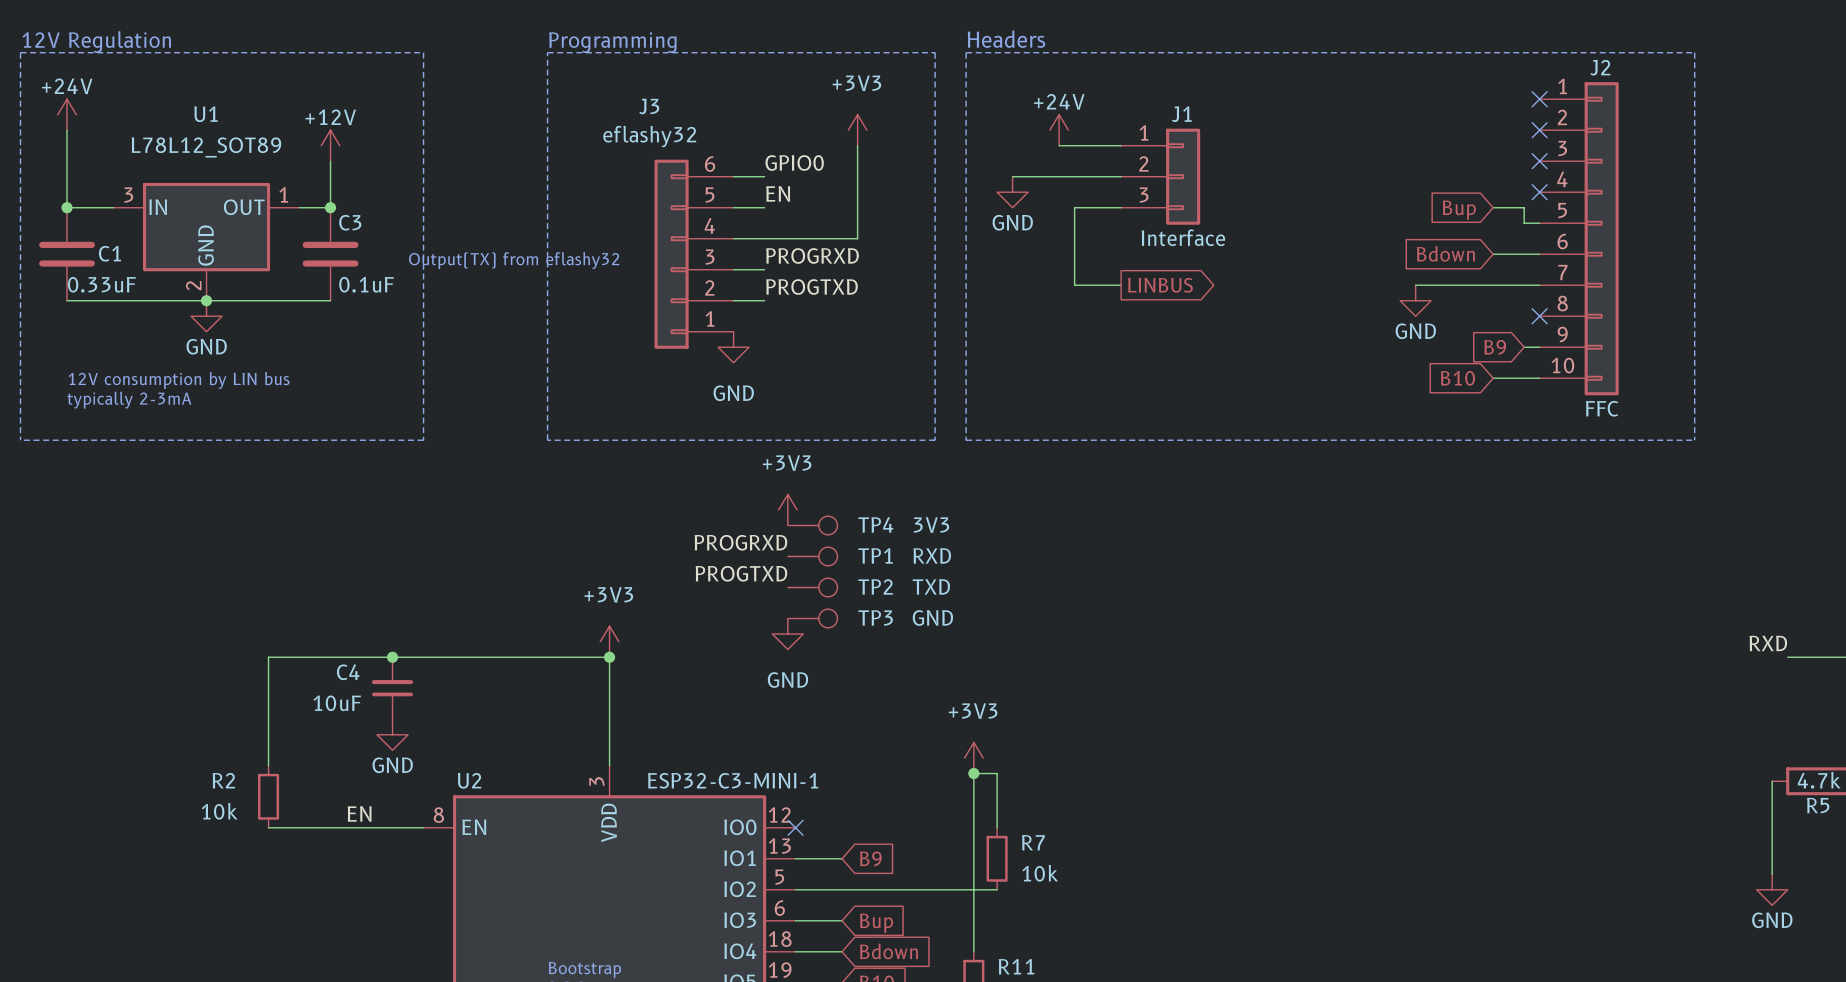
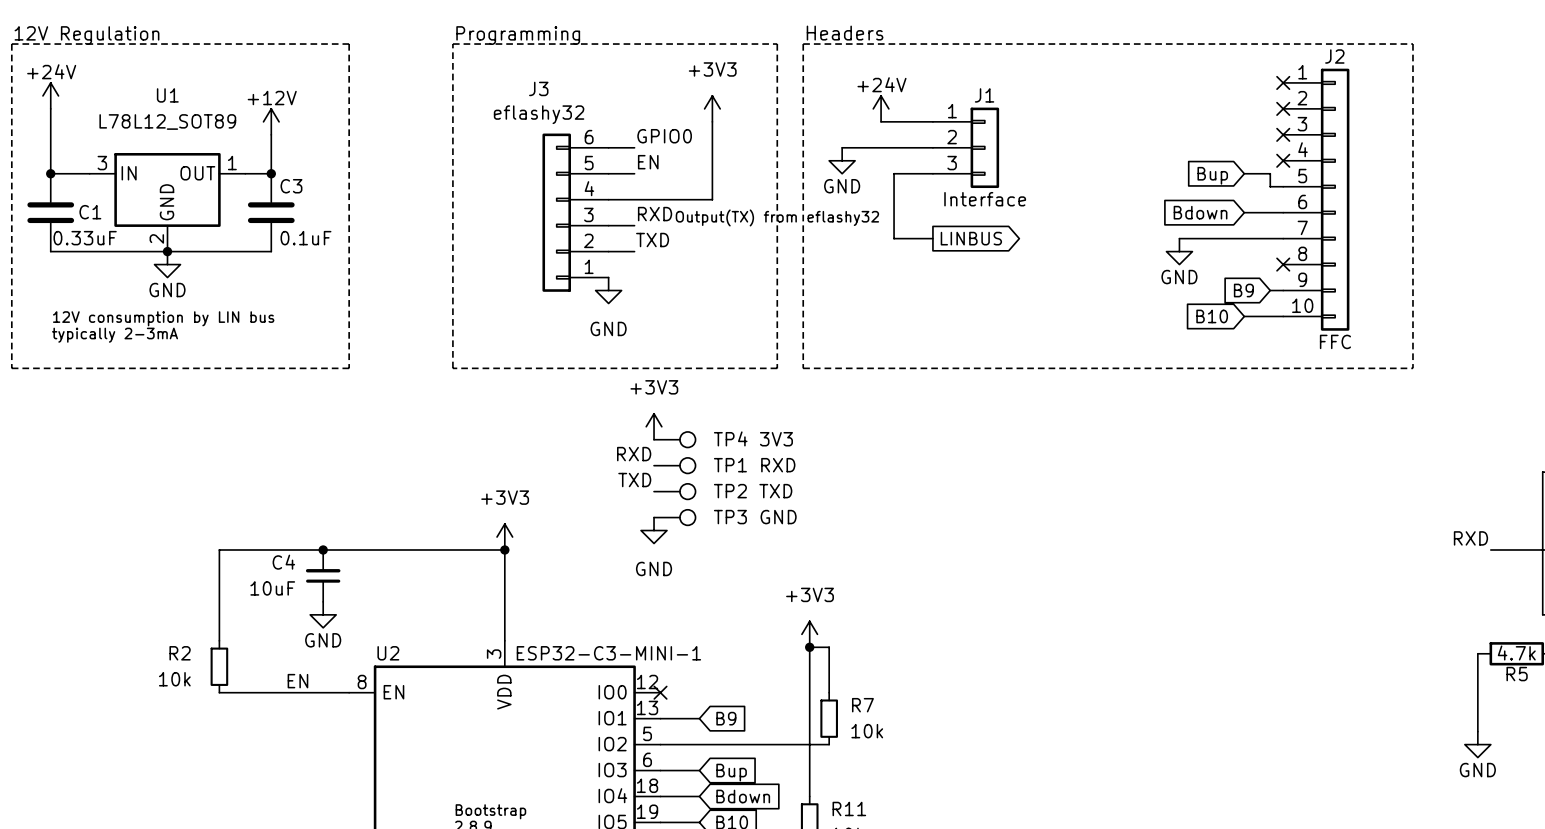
label: PROGRXD (812, 255) -> RXD (655, 214)
text: Output(TX) from eflashy32 (514, 260) -> none
text: none -> Output(TX) from eflashy32 (777, 217)
label: PROGTXD (811, 286) -> TXD (652, 240)
label: PROGRXD (740, 542) -> RXD (634, 454)
label: PROGTXD (741, 573) -> TXD (634, 480)

